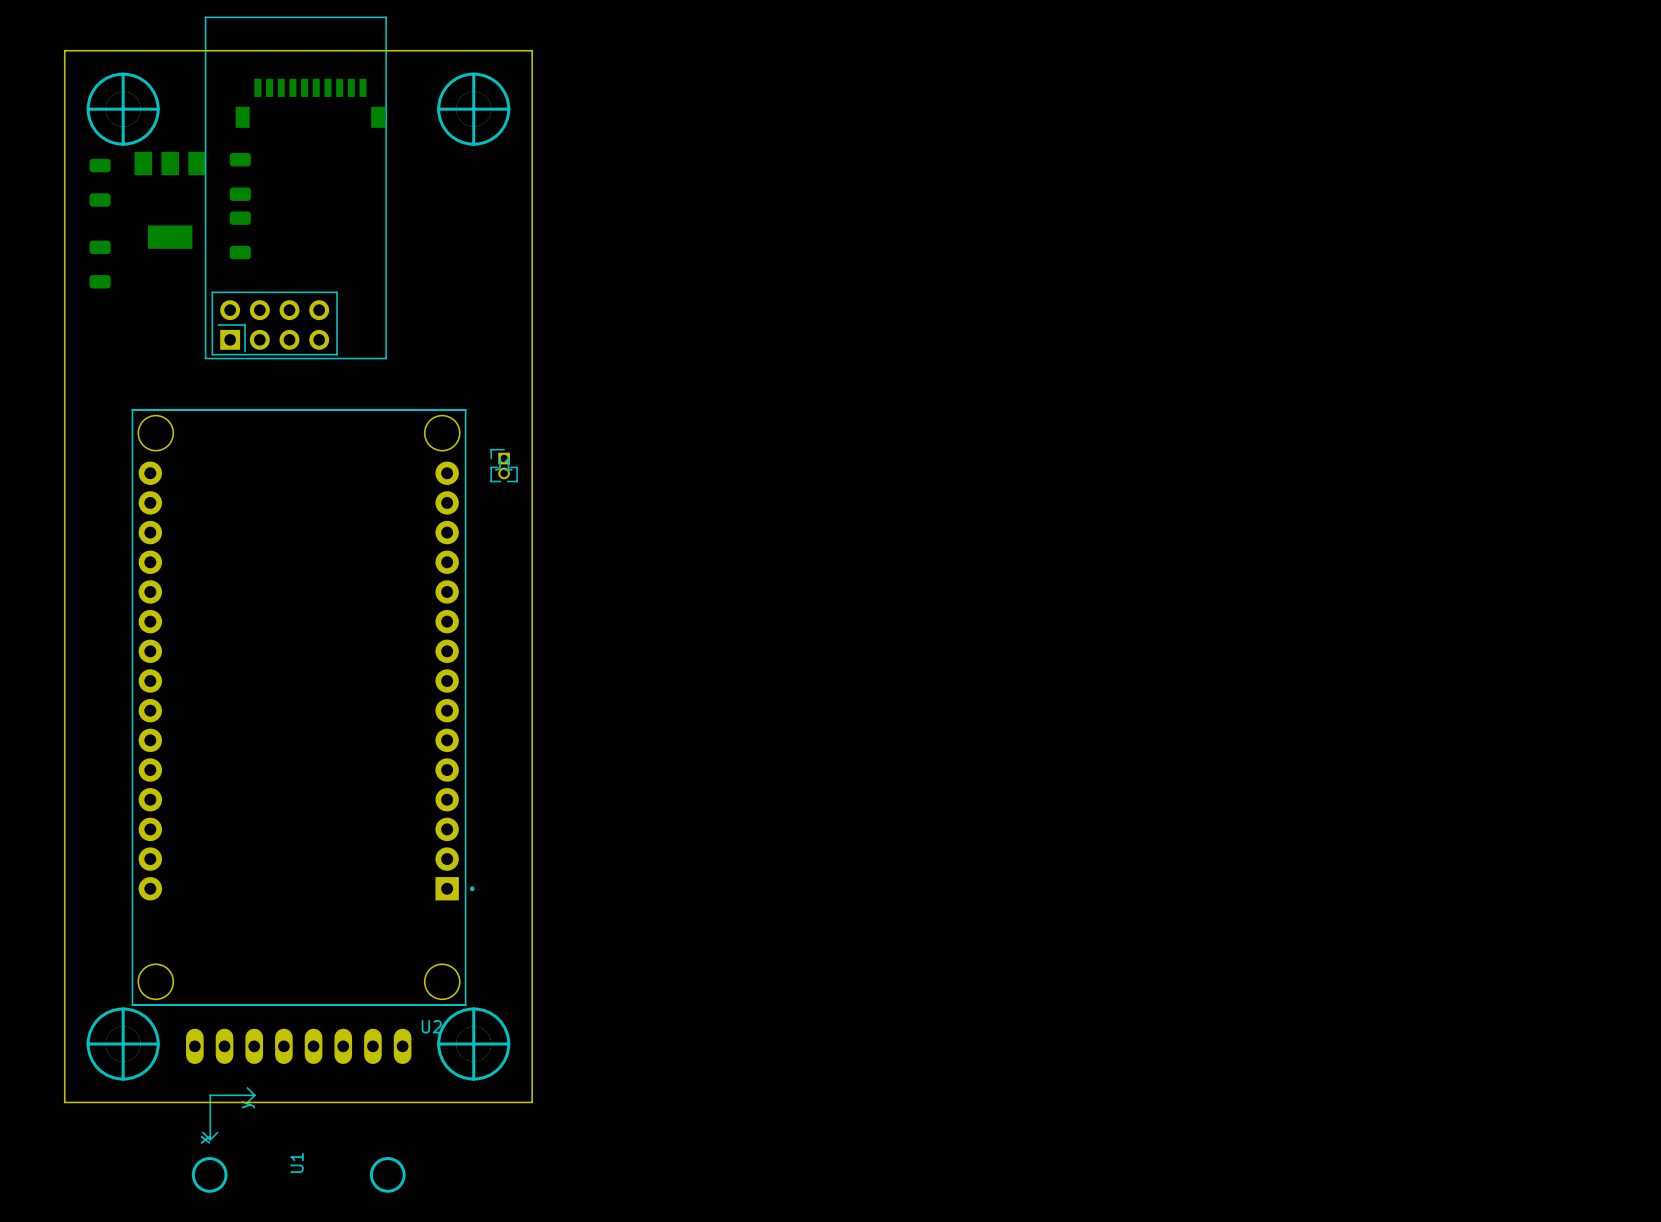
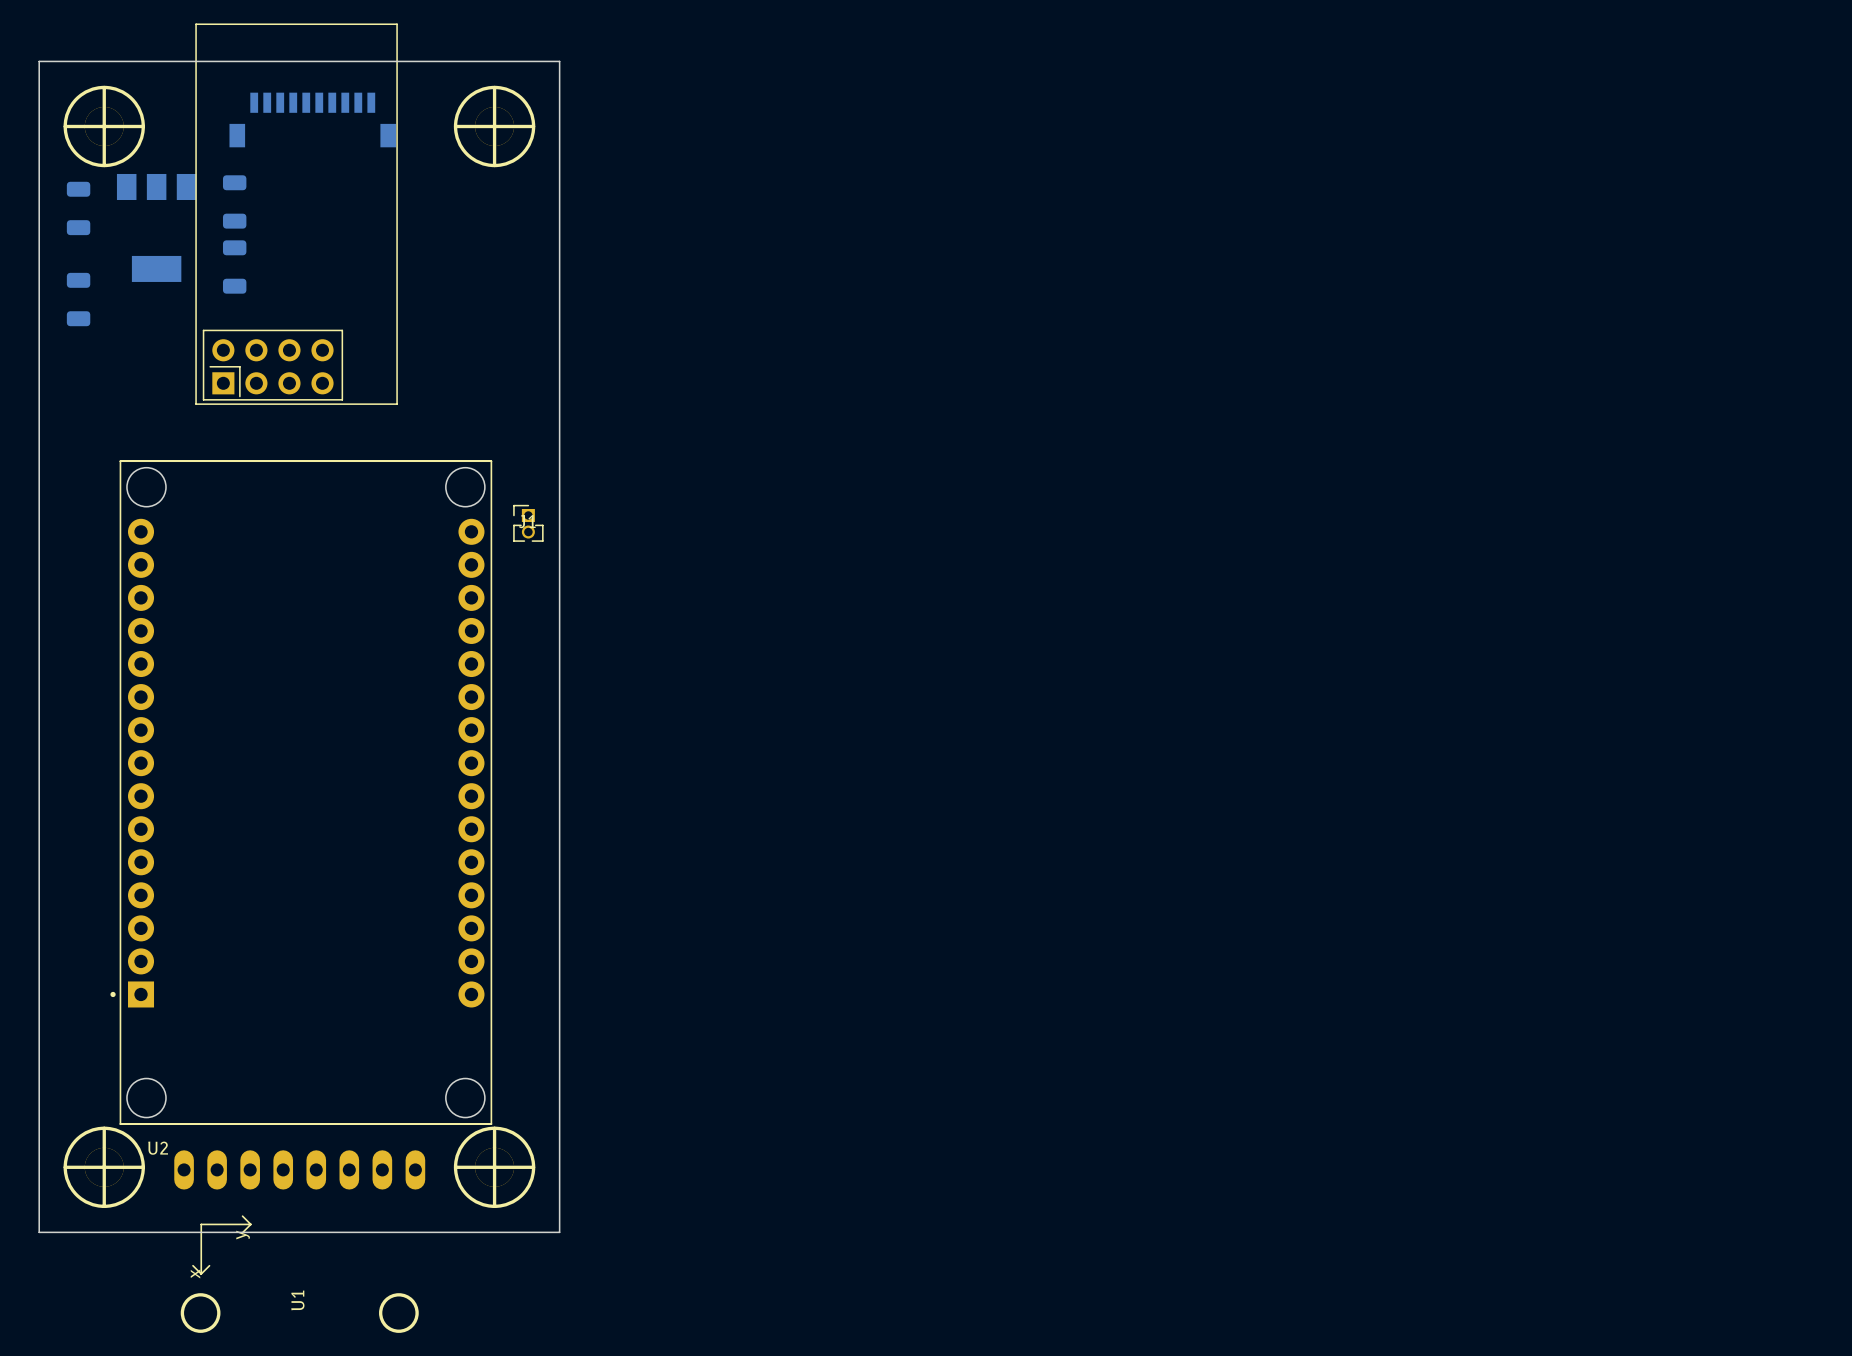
U2 footprint: [131, 409, 475, 1006] -> [110, 460, 493, 1125]
U2 name position: U2 (431, 1026) -> U2 (158, 1148)

